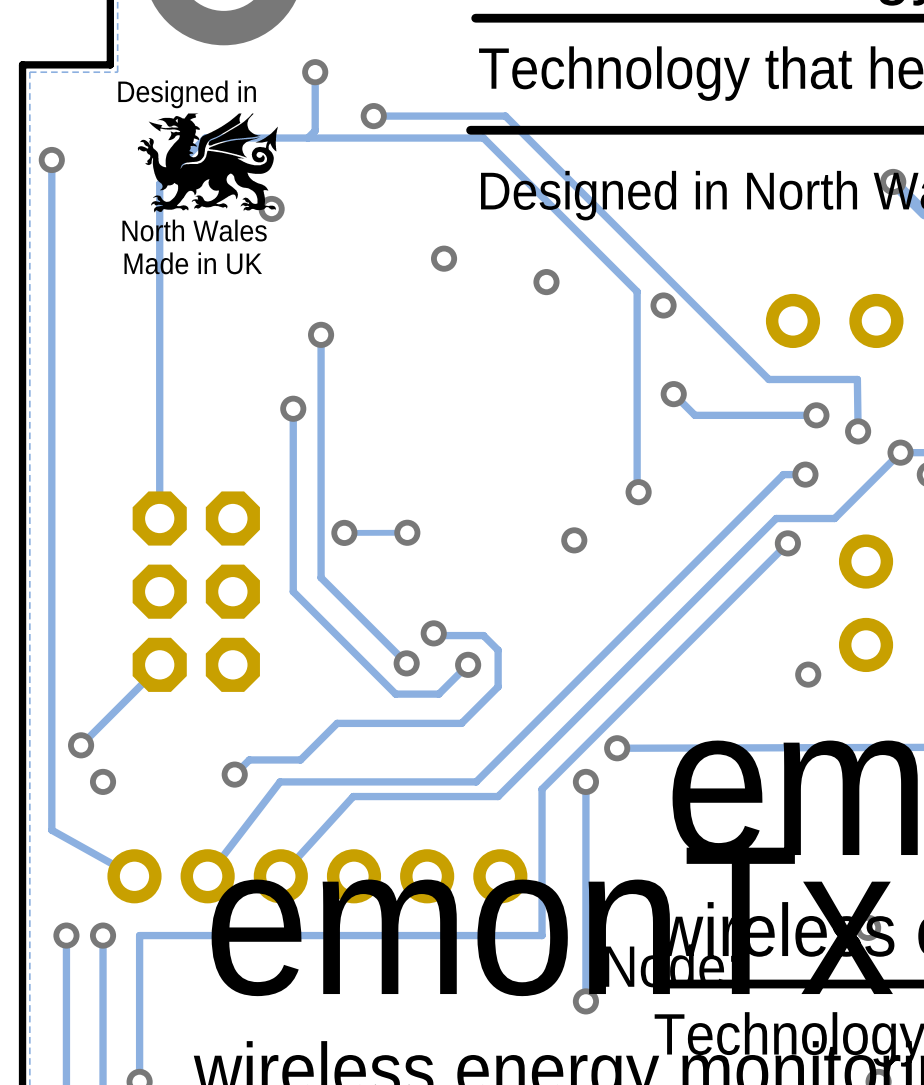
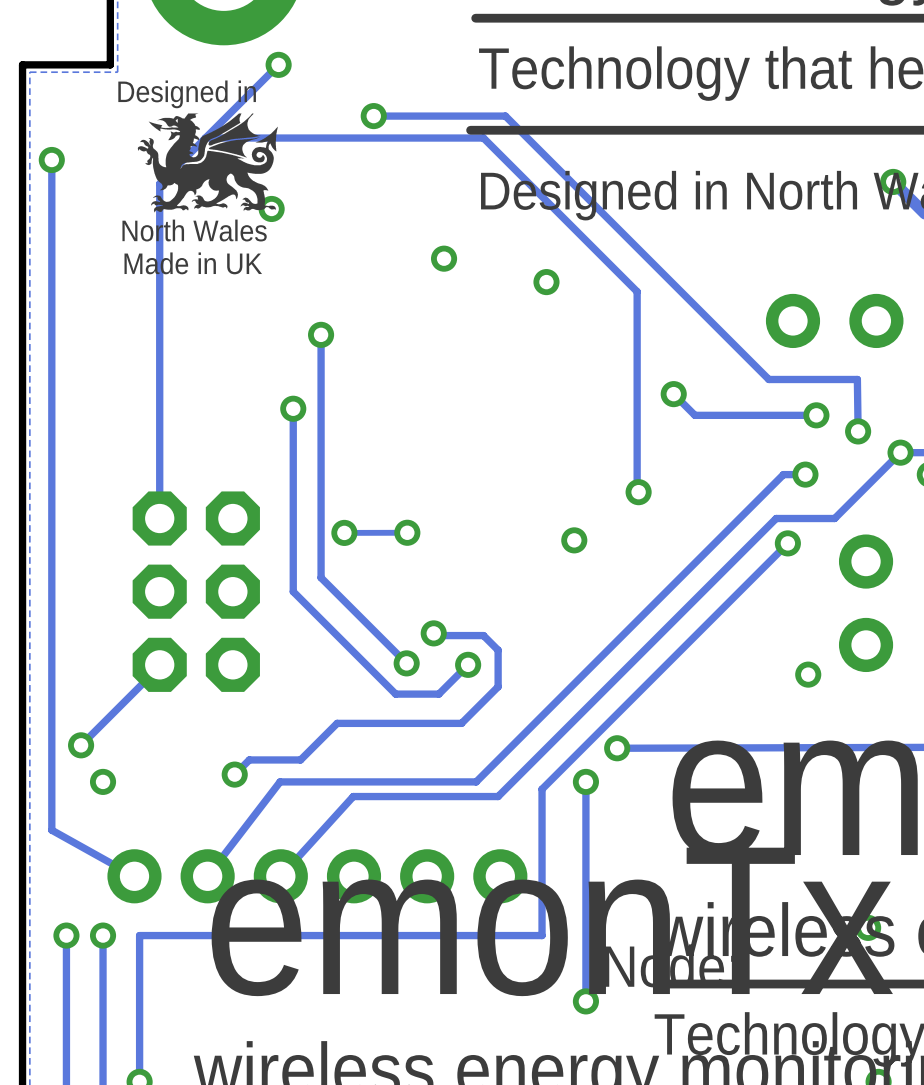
track: none -> (278, 64) (205, 138)
track: (315, 72) (315, 130) (307, 138) -> none
via position: (315, 72) -> (278, 64)
via: (663, 305) -> none

